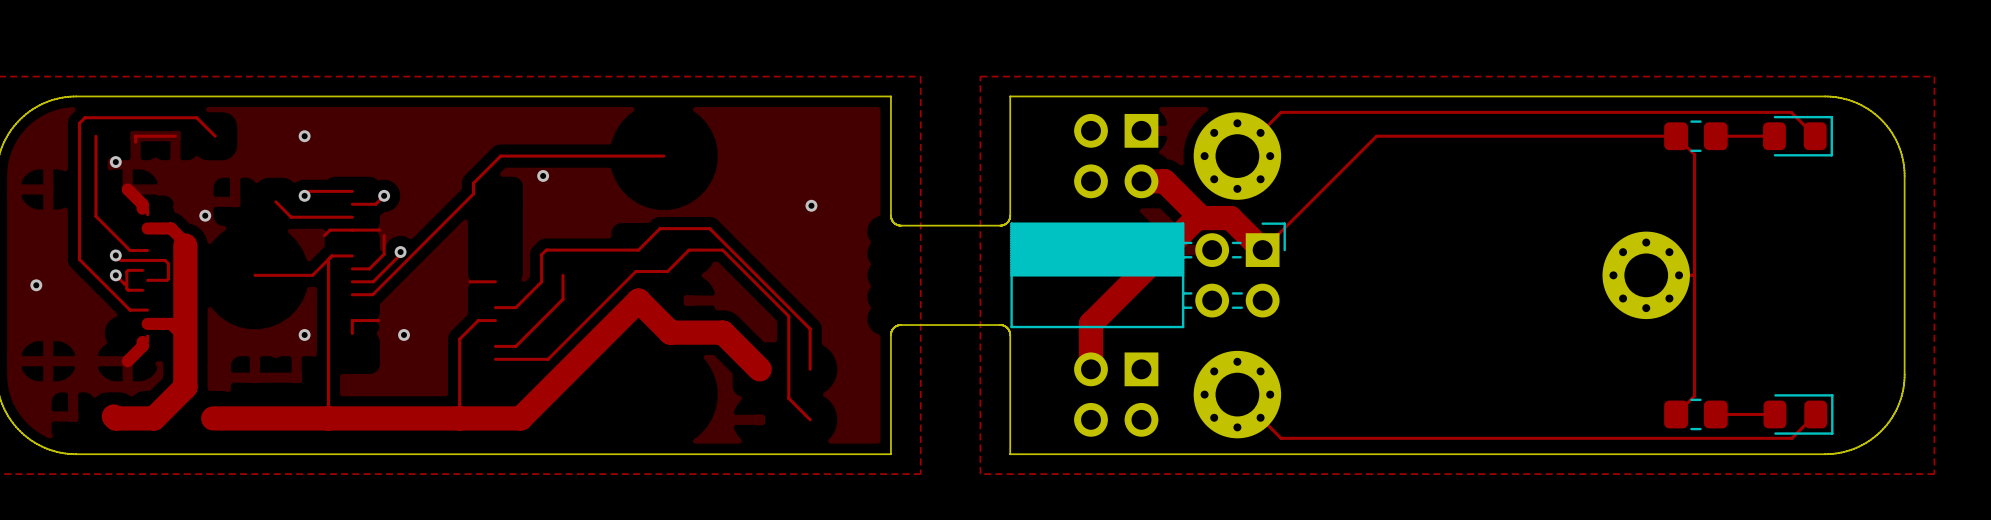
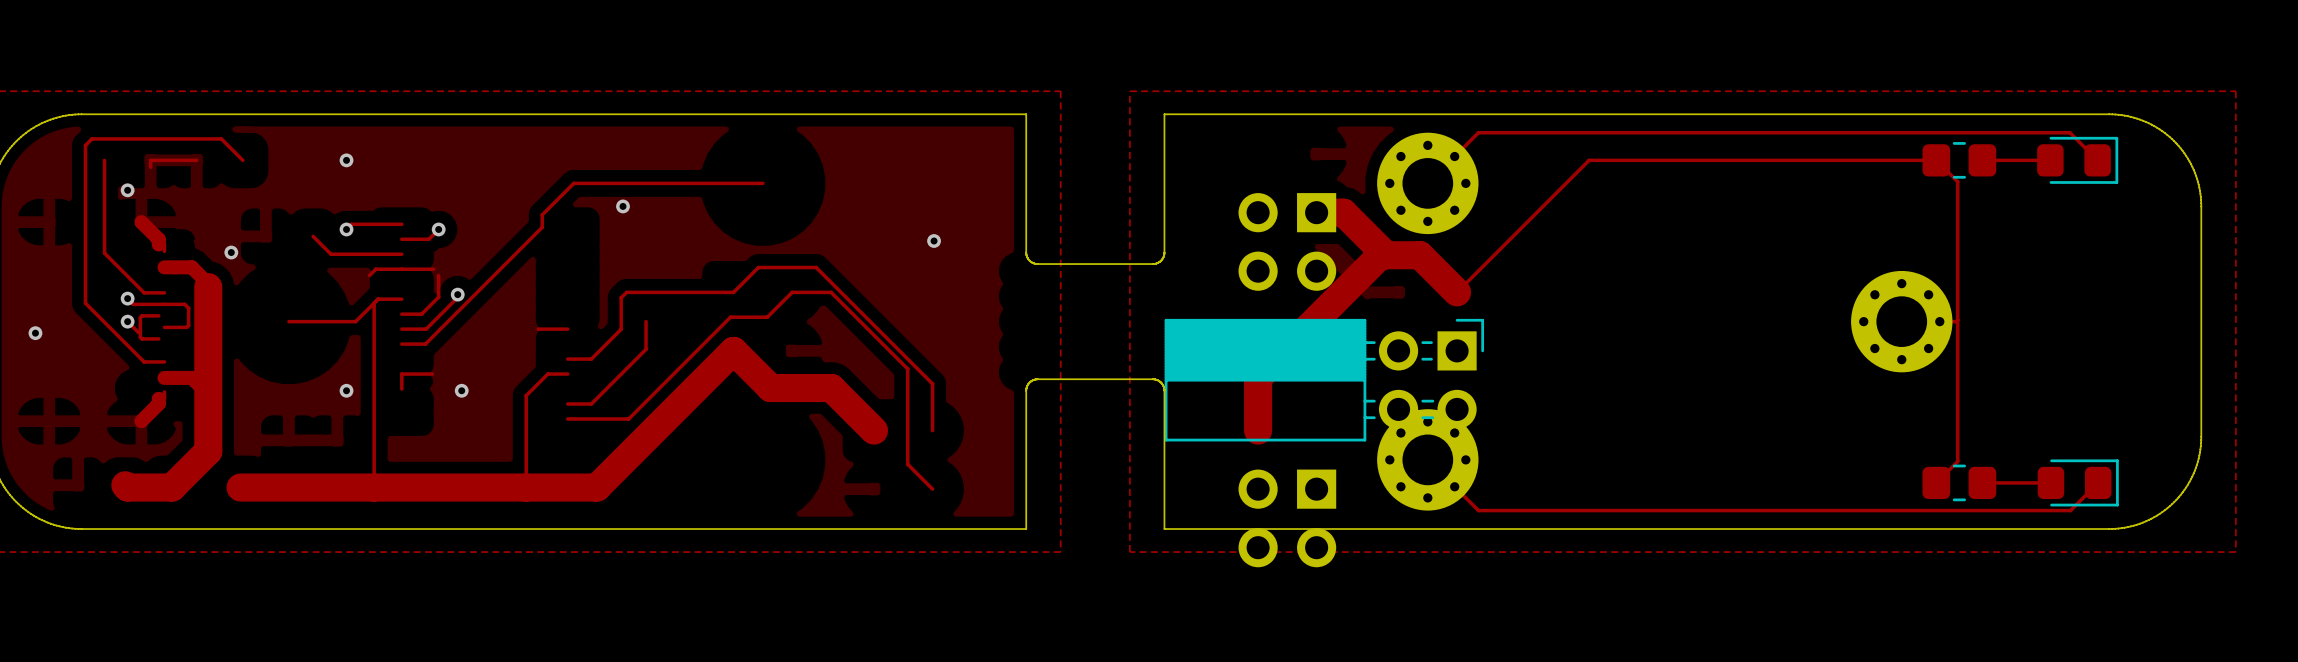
part position: (1116, 156) -> (1287, 241)
part position: (1148, 275) -> (1324, 380)
part position: (1116, 394) -> (1287, 518)

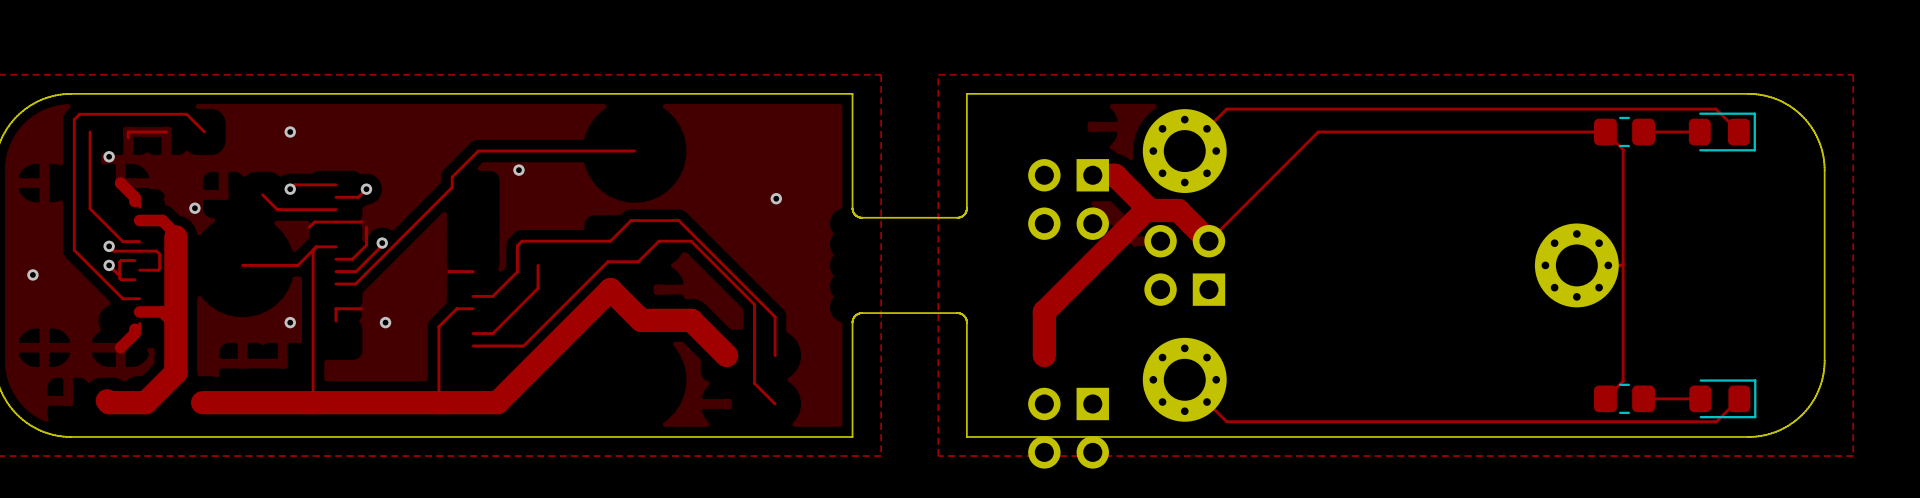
part side: top (1324, 380) -> bottom (1184, 265)

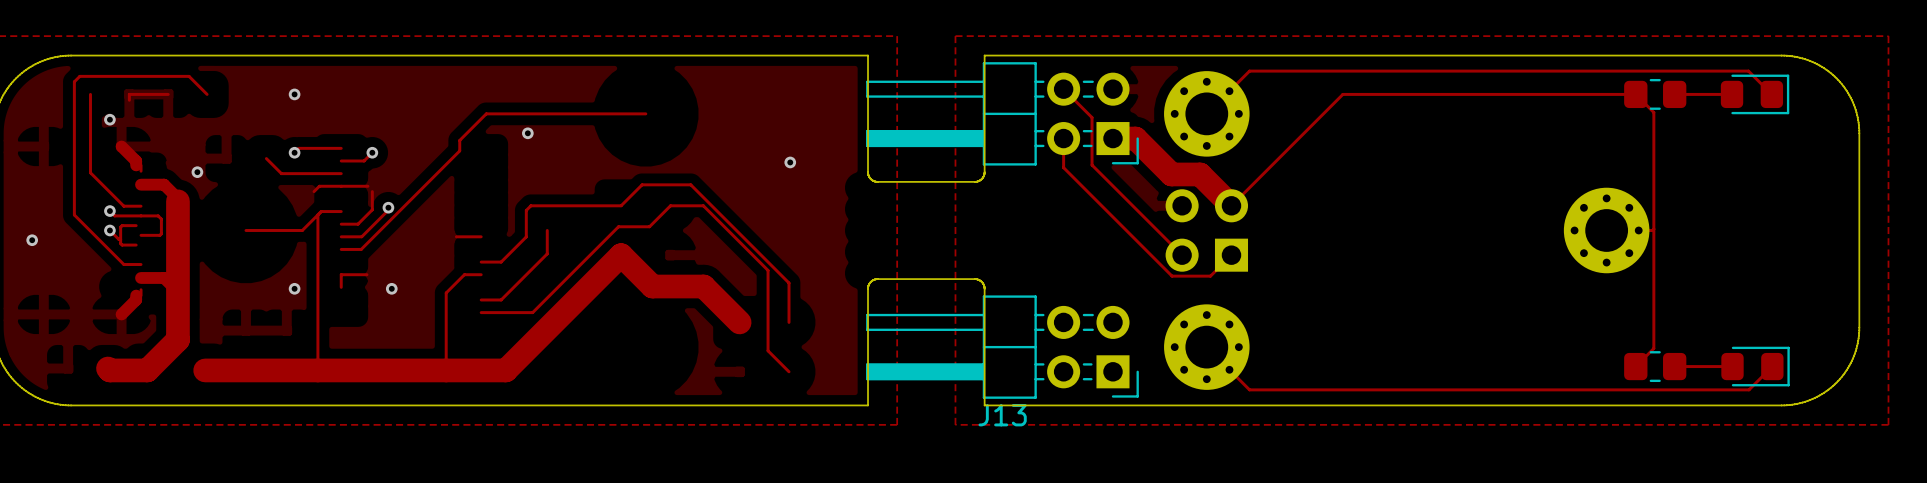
track: none -> (1063, 89) (1092, 117) (1092, 165) (1182, 255)
track: none -> (1063, 138) (1063, 167) (1172, 276) (1210, 276) (1231, 255)
part side: bottom (1068, 199) -> top (1002, 113)
track: (1150, 210) (1145, 210) (1044, 311) (1044, 355) -> none
J13 side: bottom (1068, 428) -> top (1002, 347)

